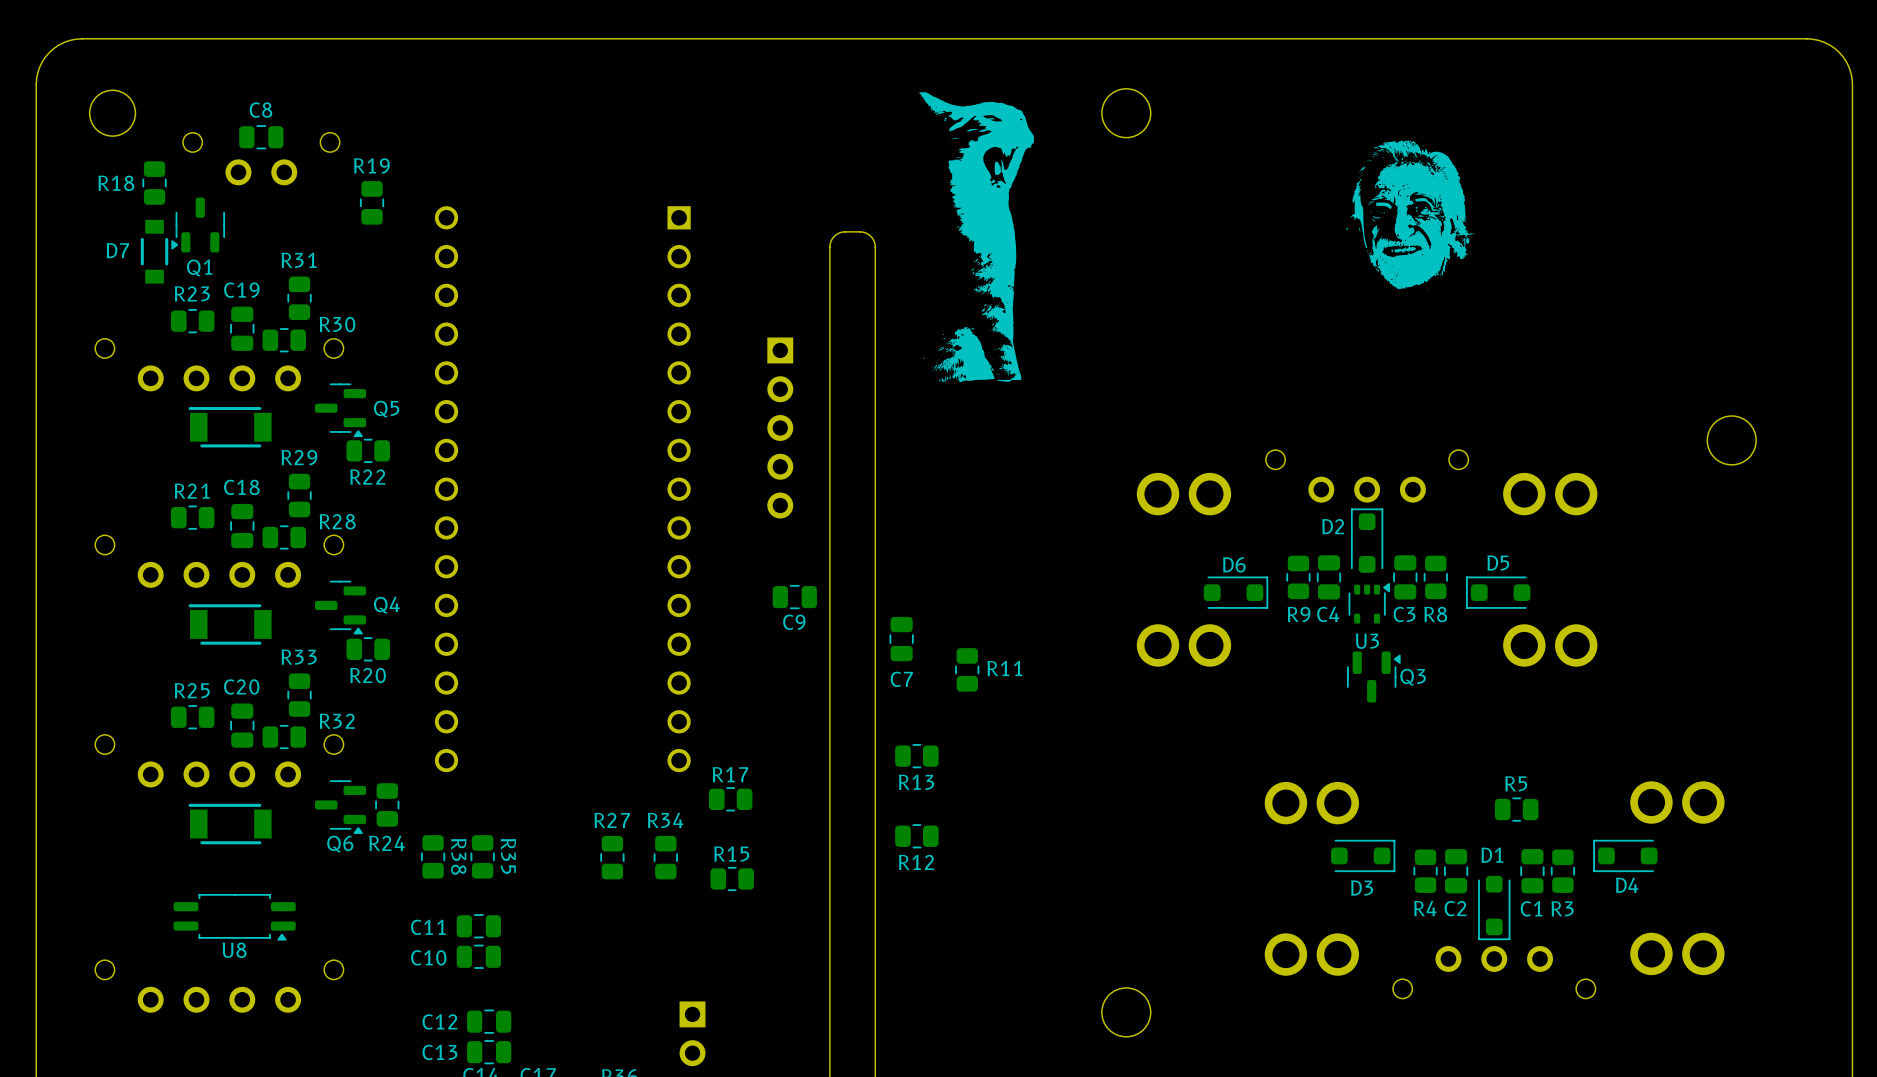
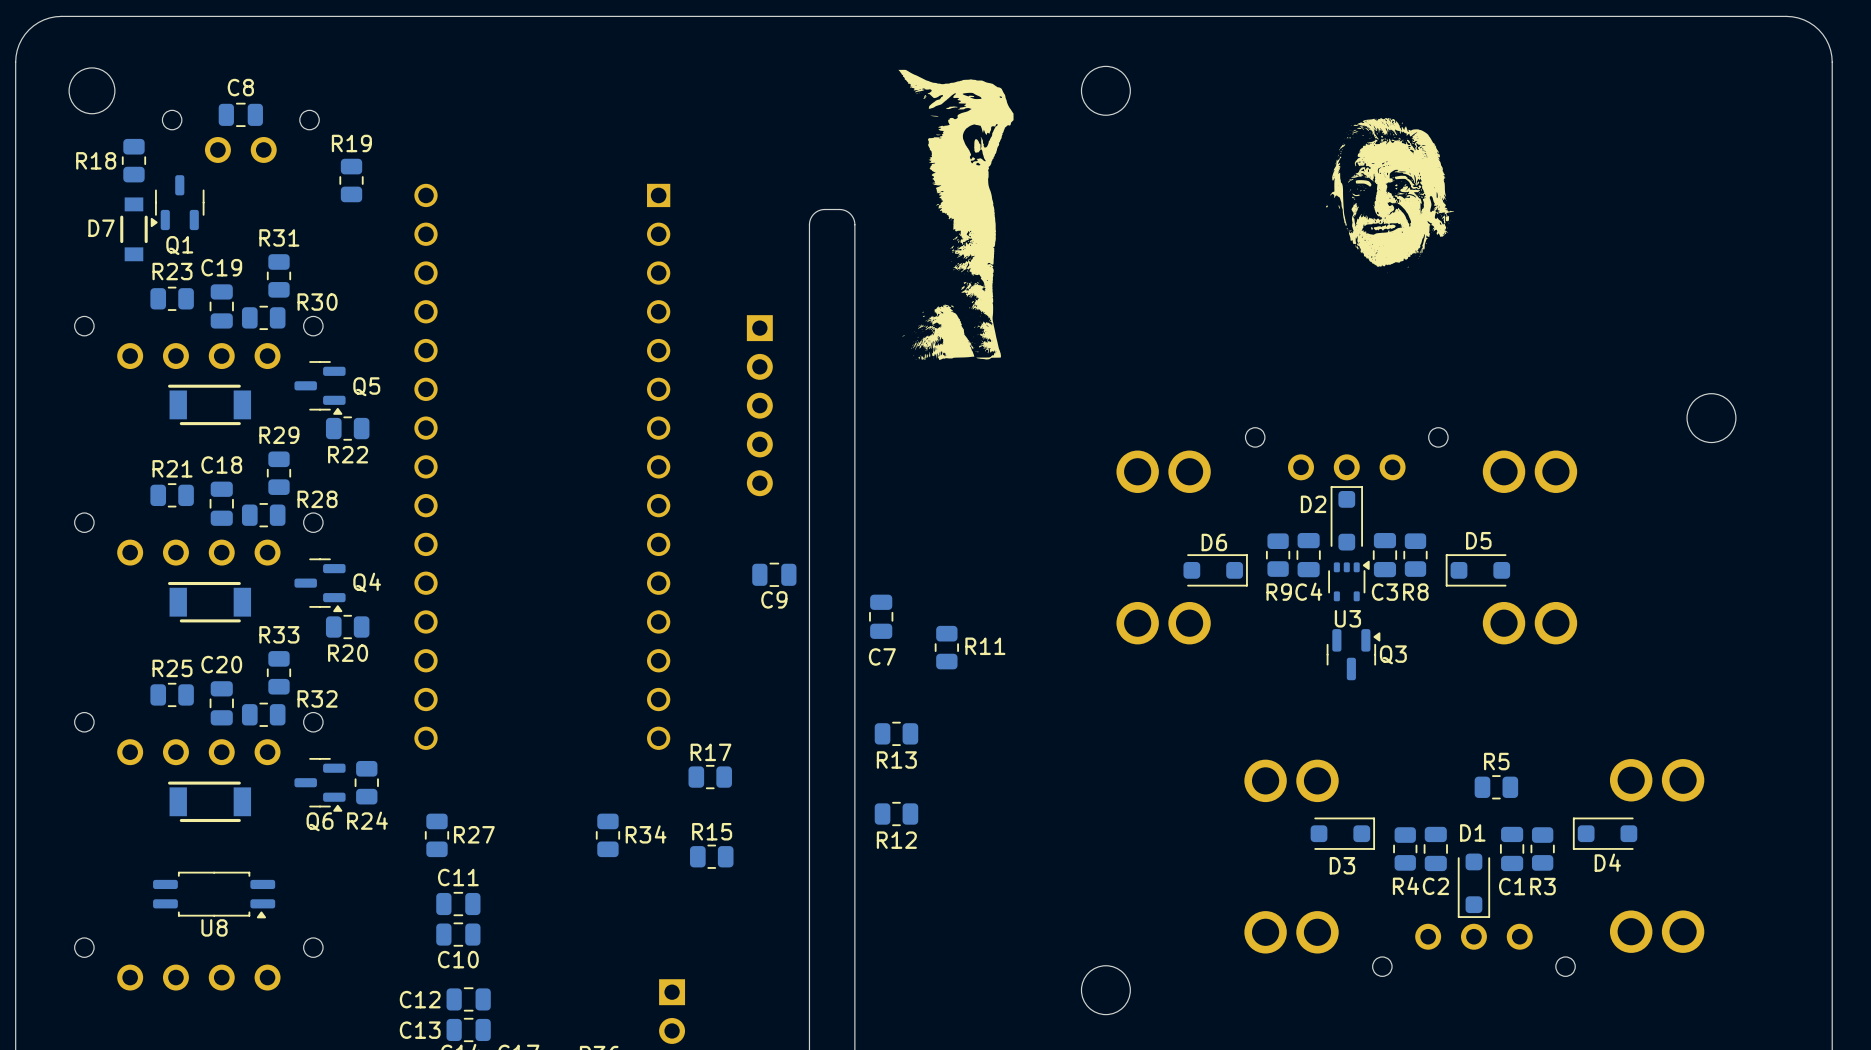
R27 name position: R27 (612, 820) -> R27 (474, 834)
R34 name position: R34 (665, 820) -> R34 (646, 834)
R38: (433, 856) -> none
R35: (482, 856) -> none
R27 position: (612, 857) -> (436, 835)
R34 position: (665, 857) -> (607, 835)
C11 name position: C11 (428, 927) -> C11 (458, 877)
C10 name position: C10 (428, 957) -> C10 (458, 959)

